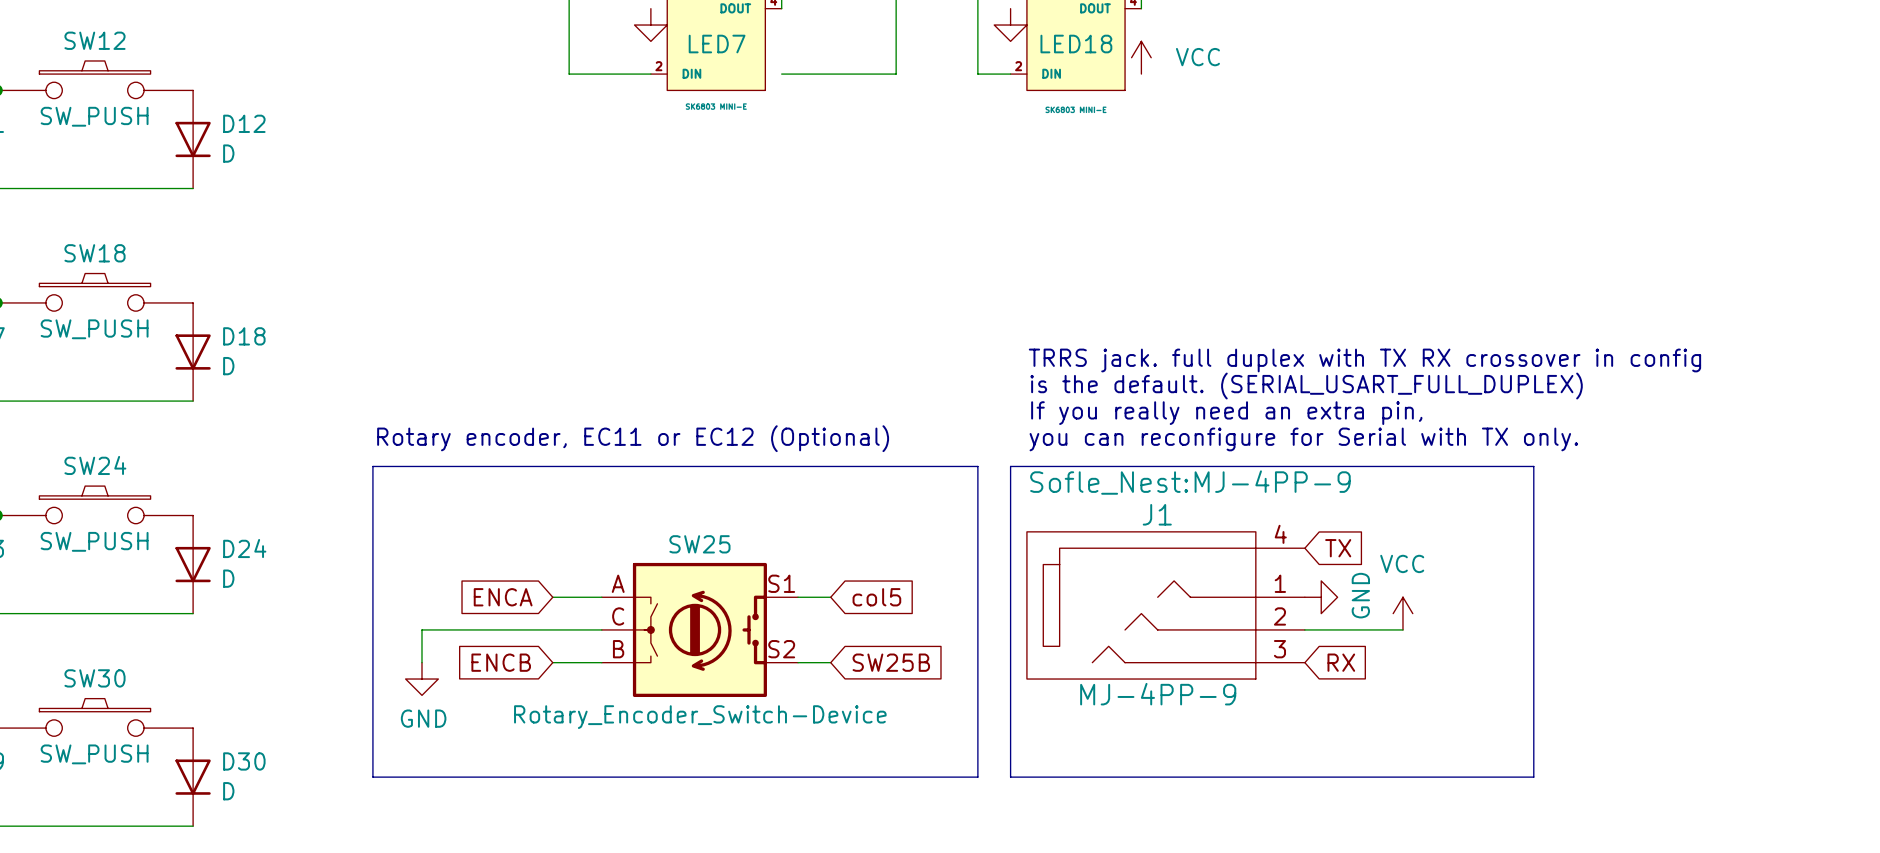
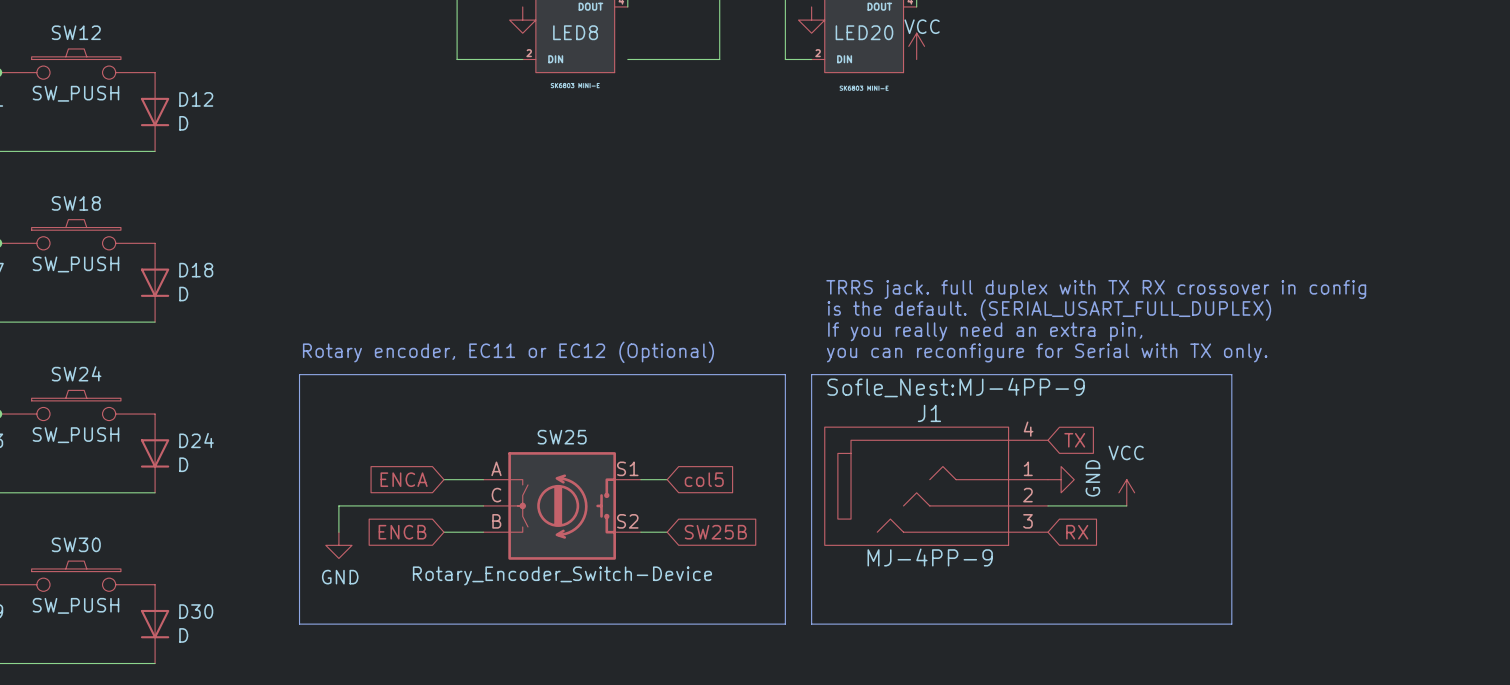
LED7 name: LED7 (717, 44) -> LED8 (575, 32)
LED18 name: LED18 (1076, 44) -> LED20 (864, 32)
power symbol text position: VCC (1197, 57) -> VCC (922, 26)

